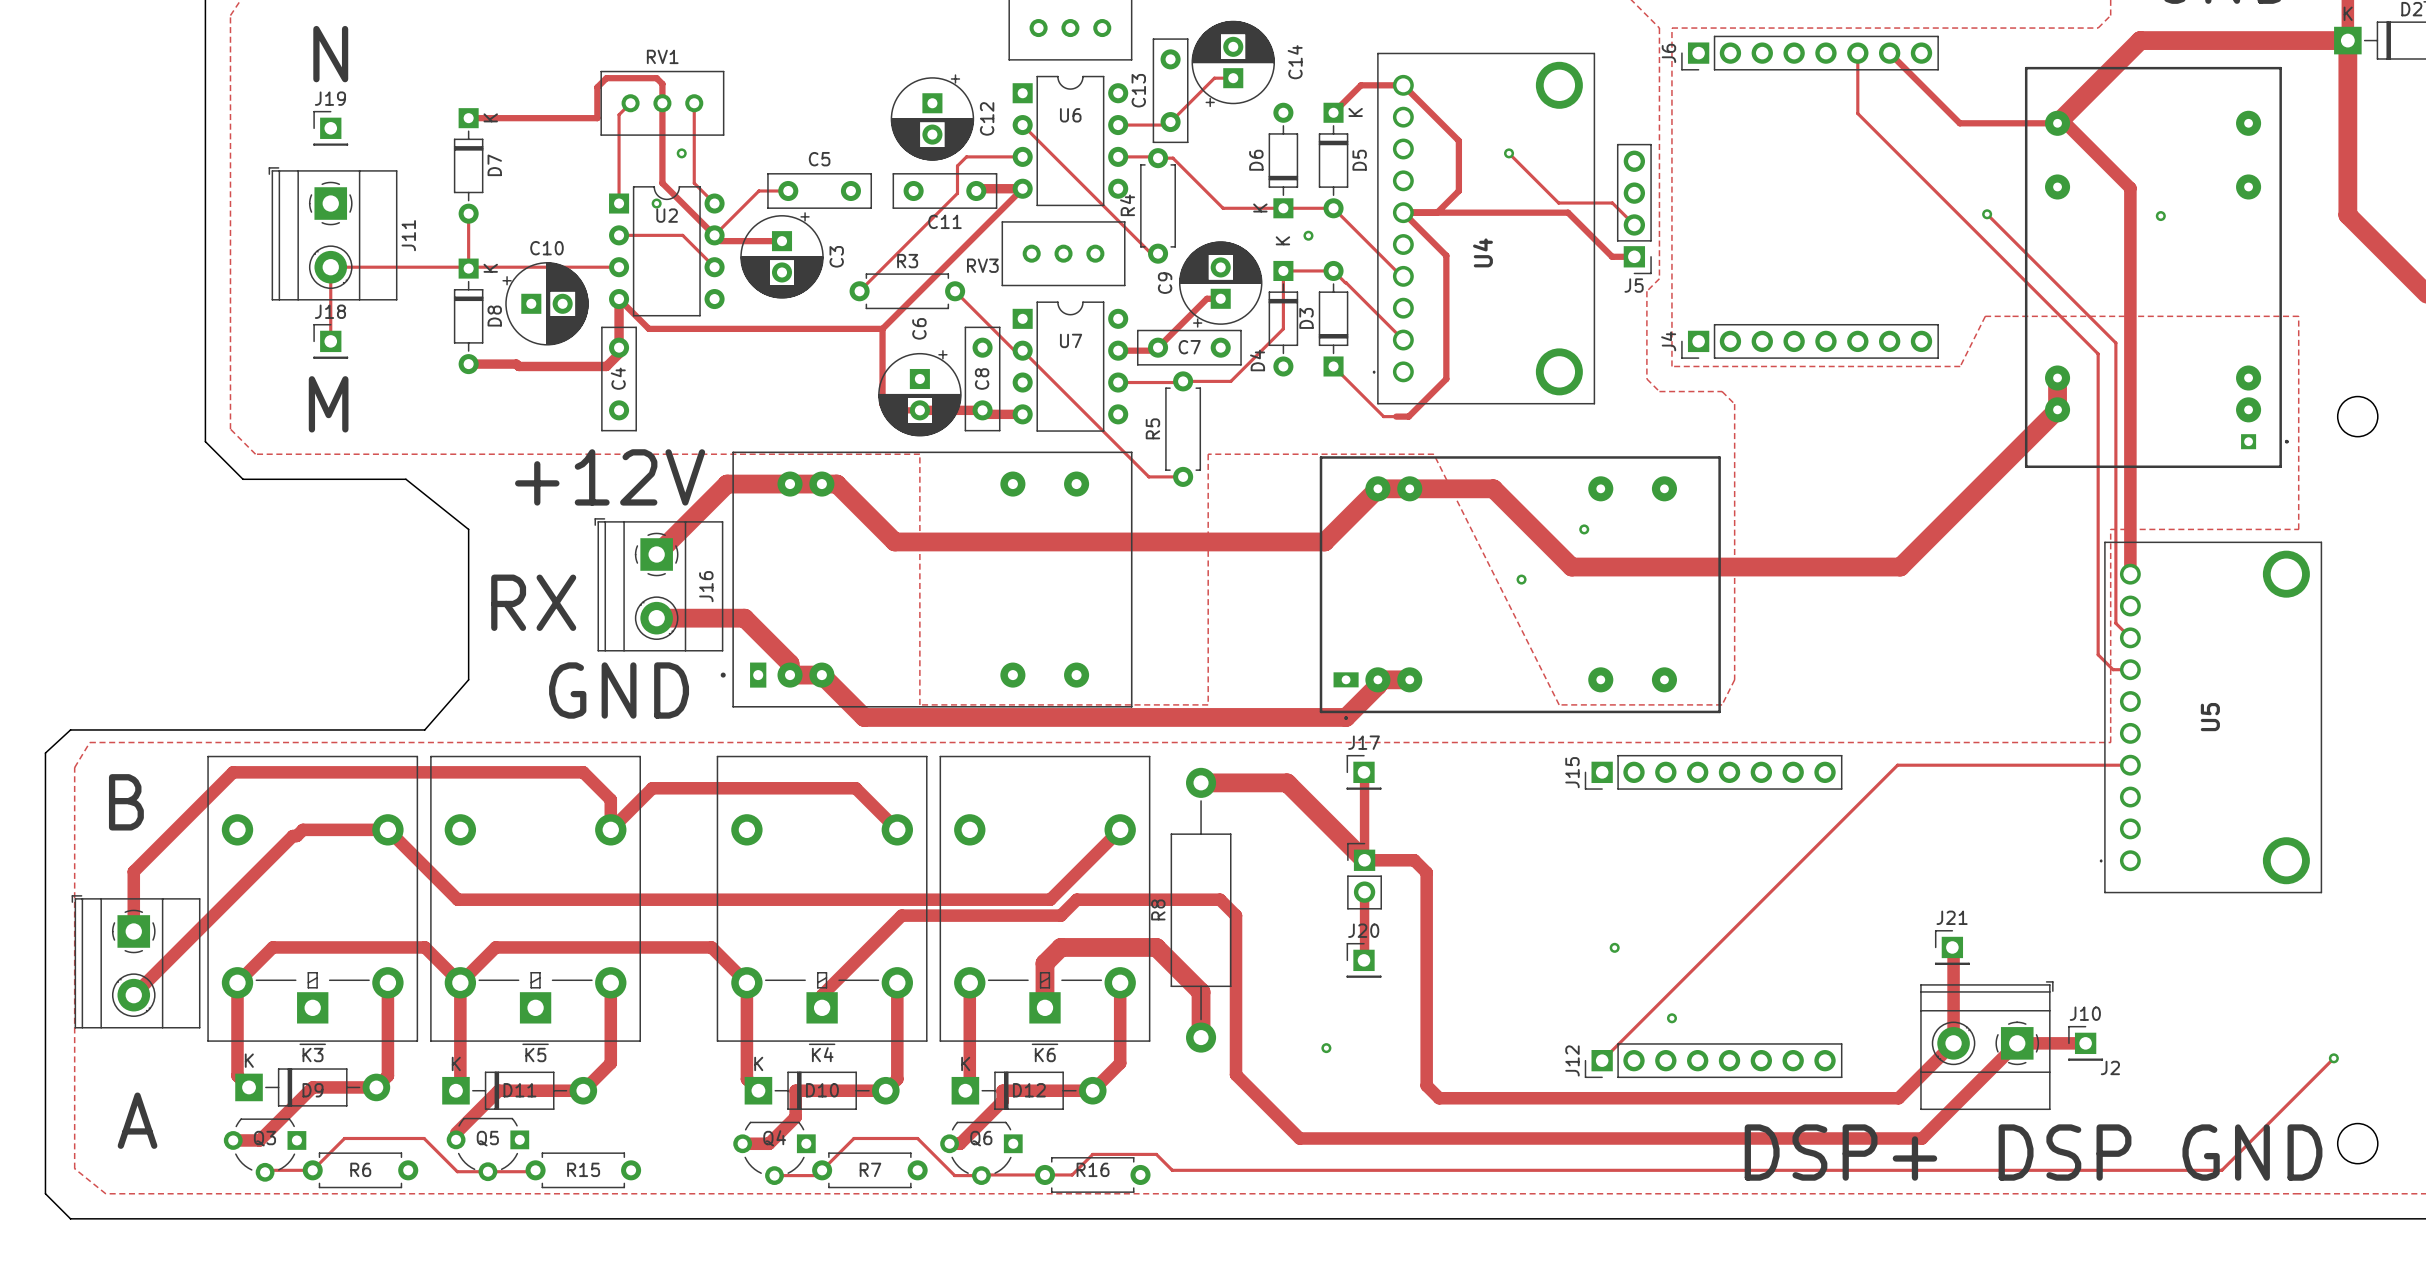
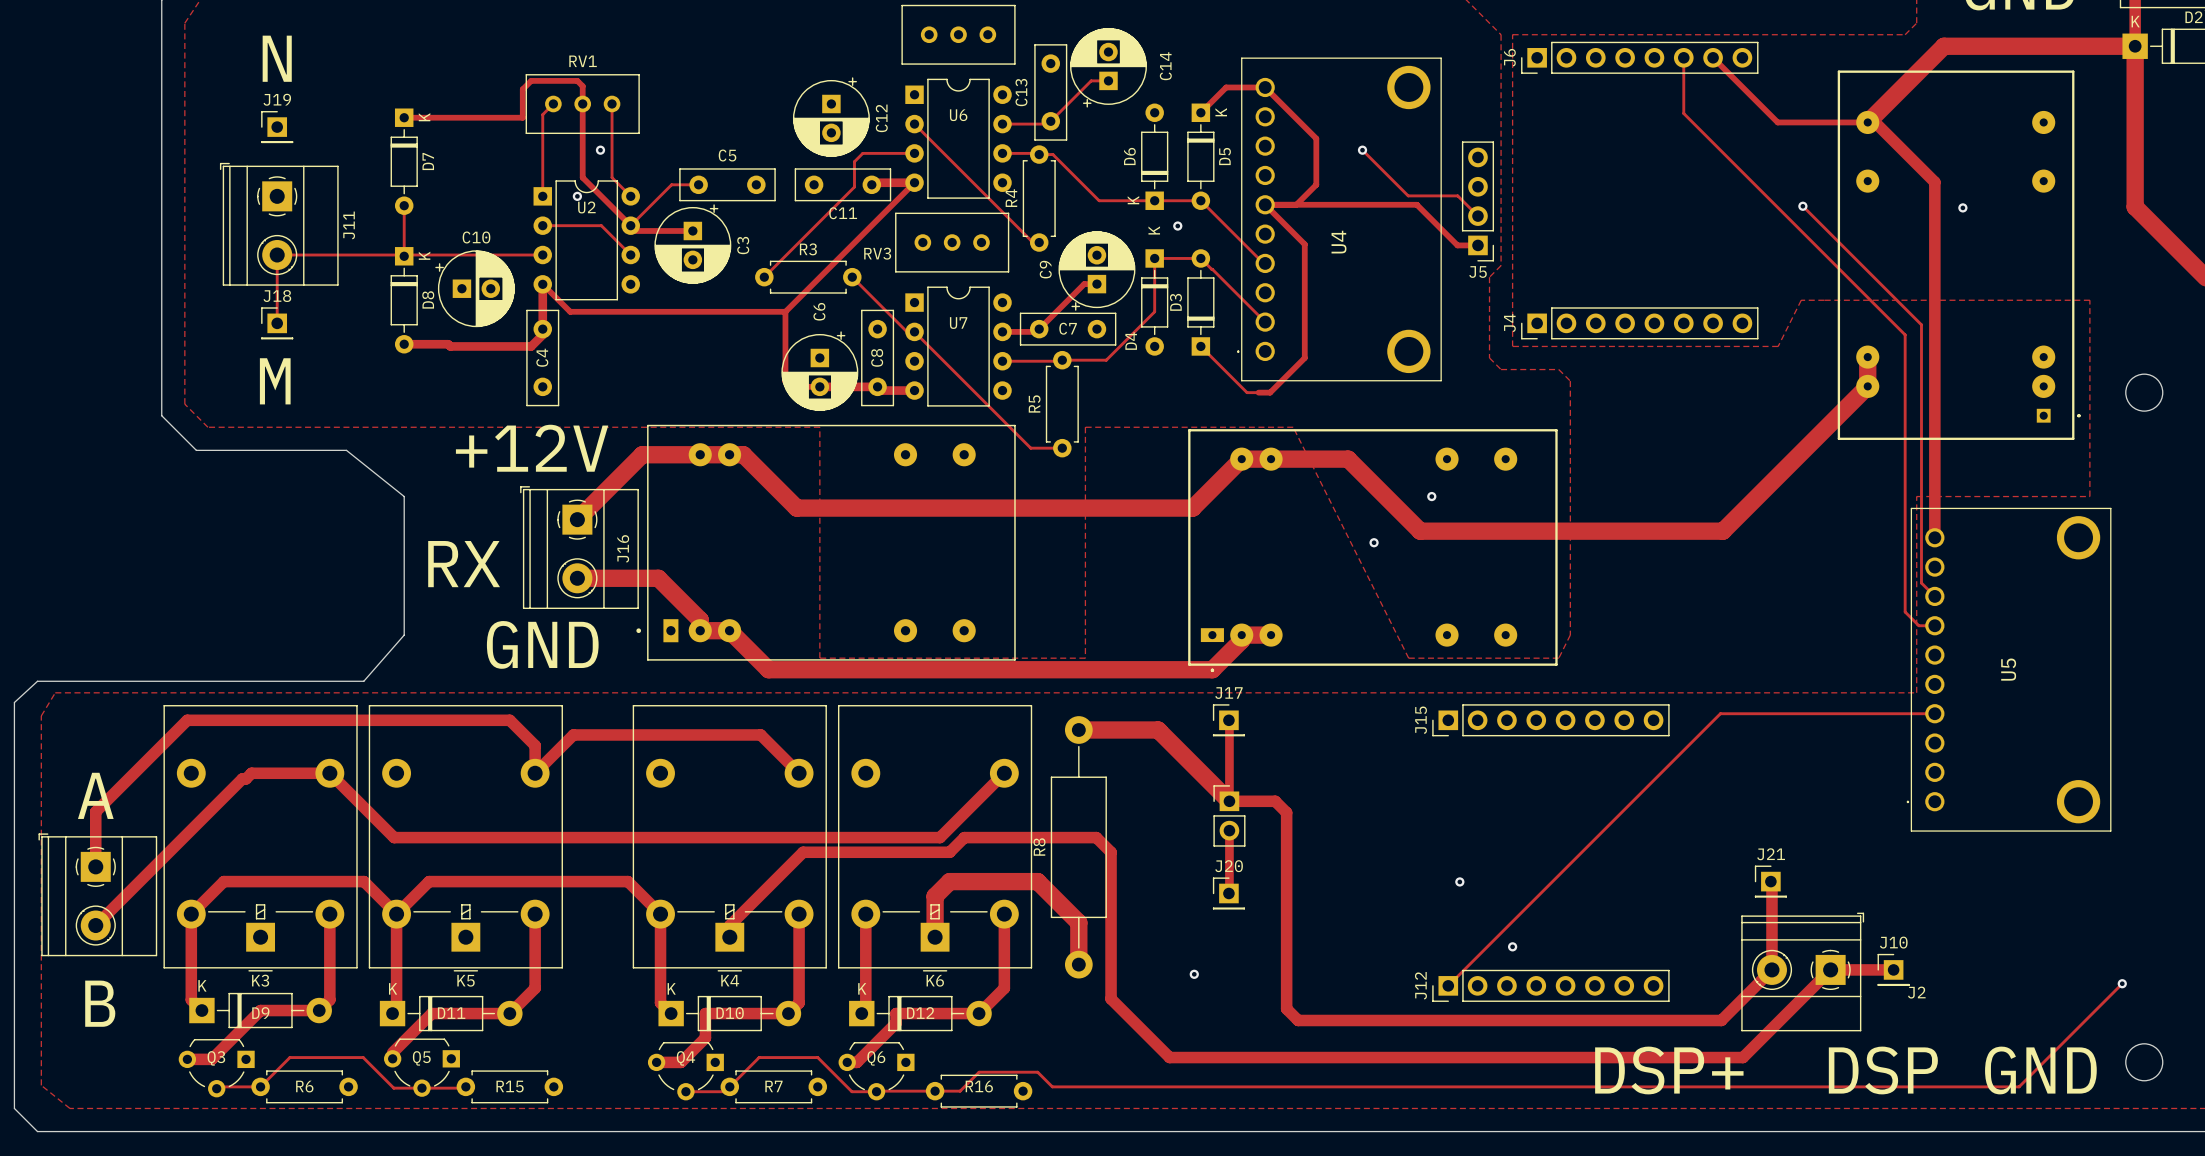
text position: B (126, 802) -> B (100, 1003)
text position: A (137, 1120) -> A (95, 795)

